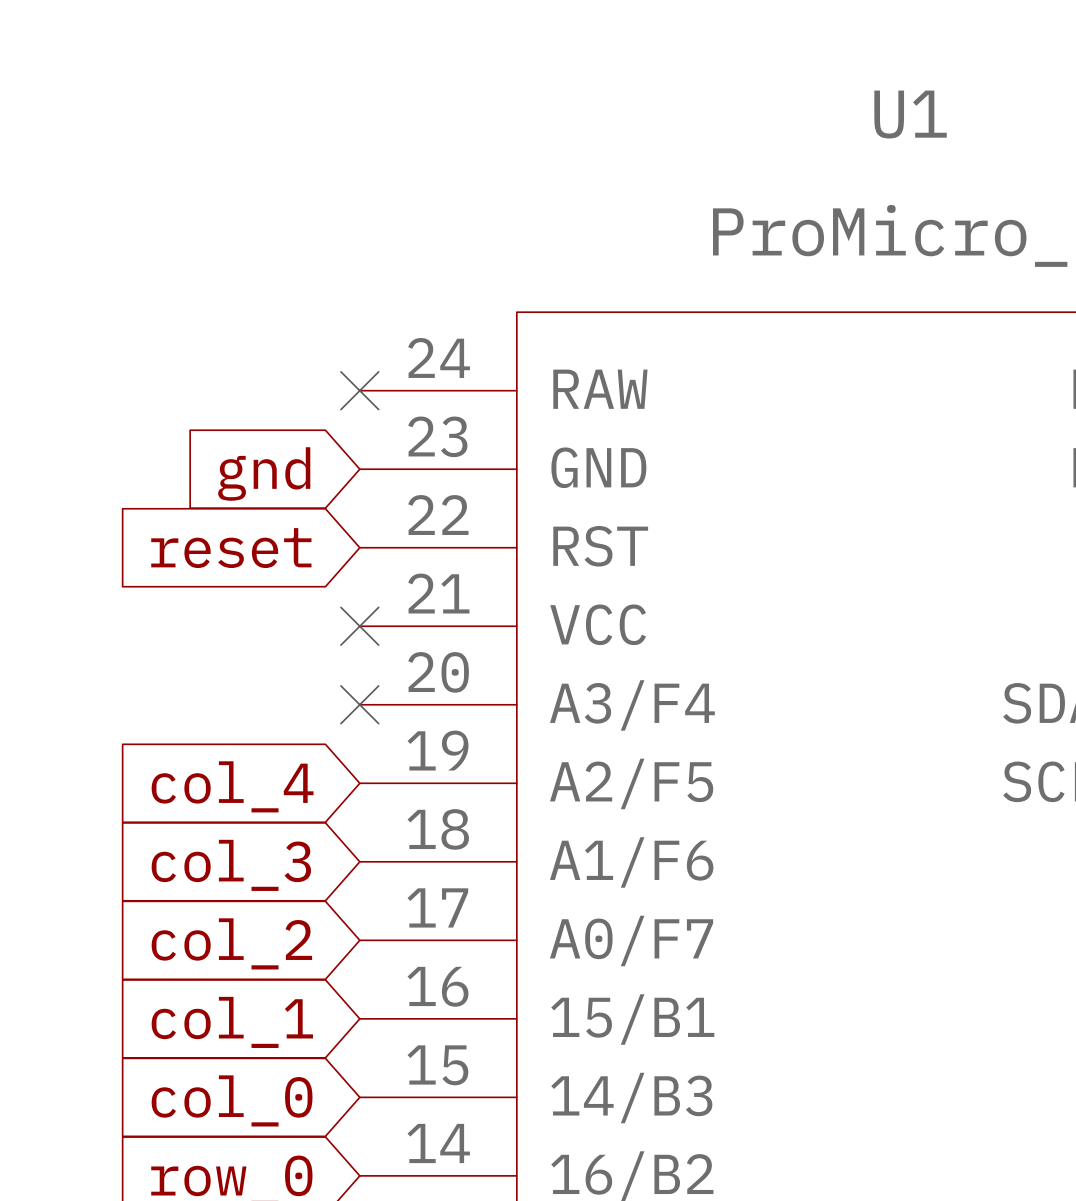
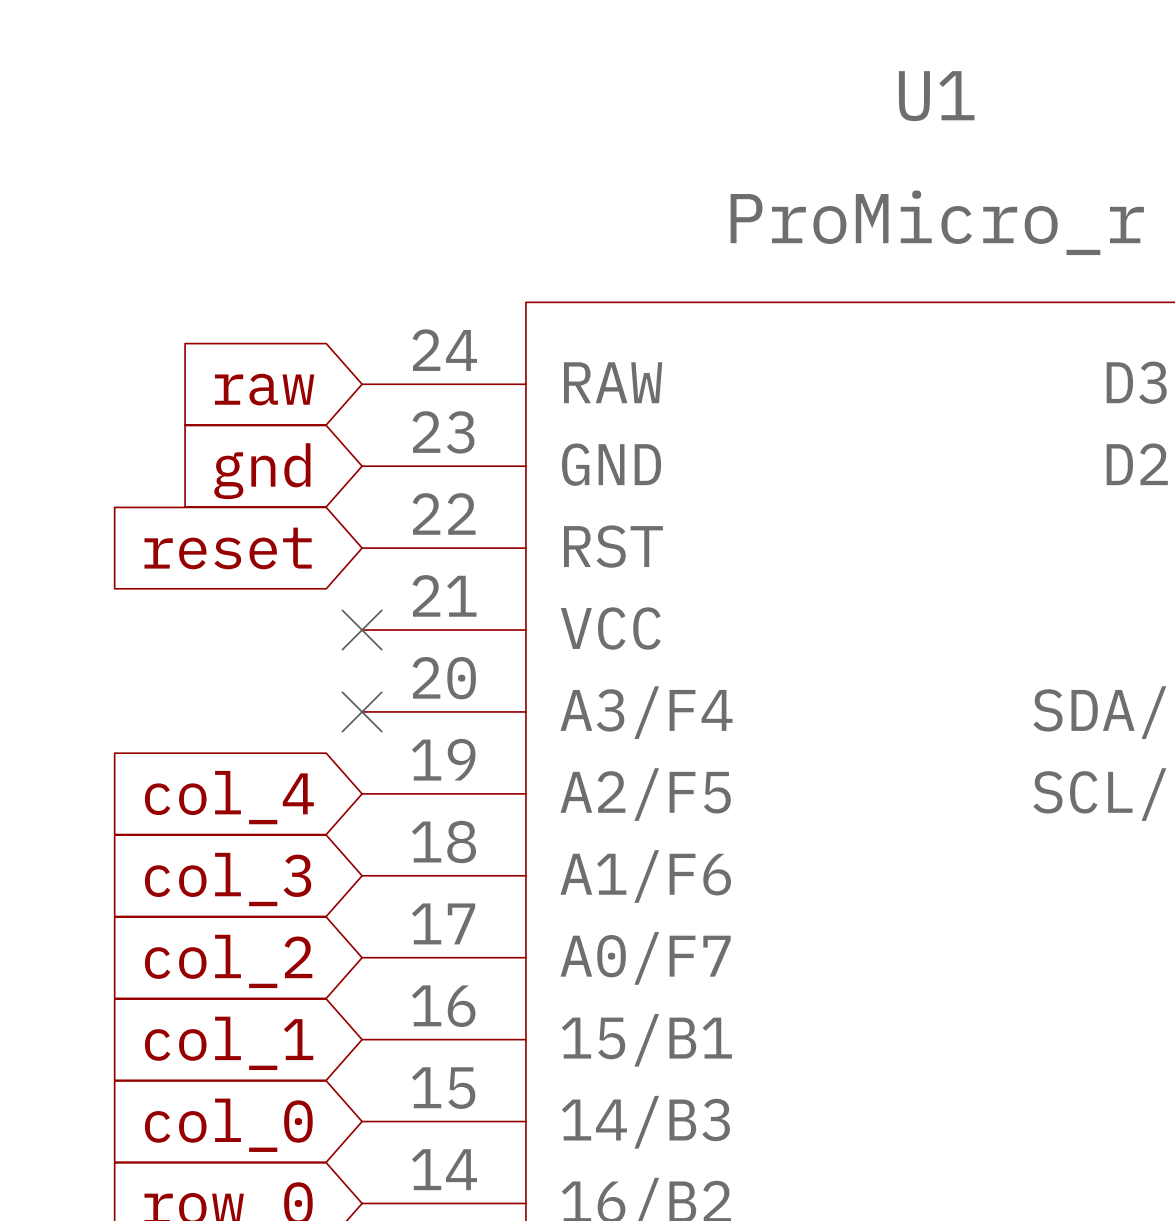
no-connect mark: (359, 390) -> none
global label: none -> raw (264, 389)

